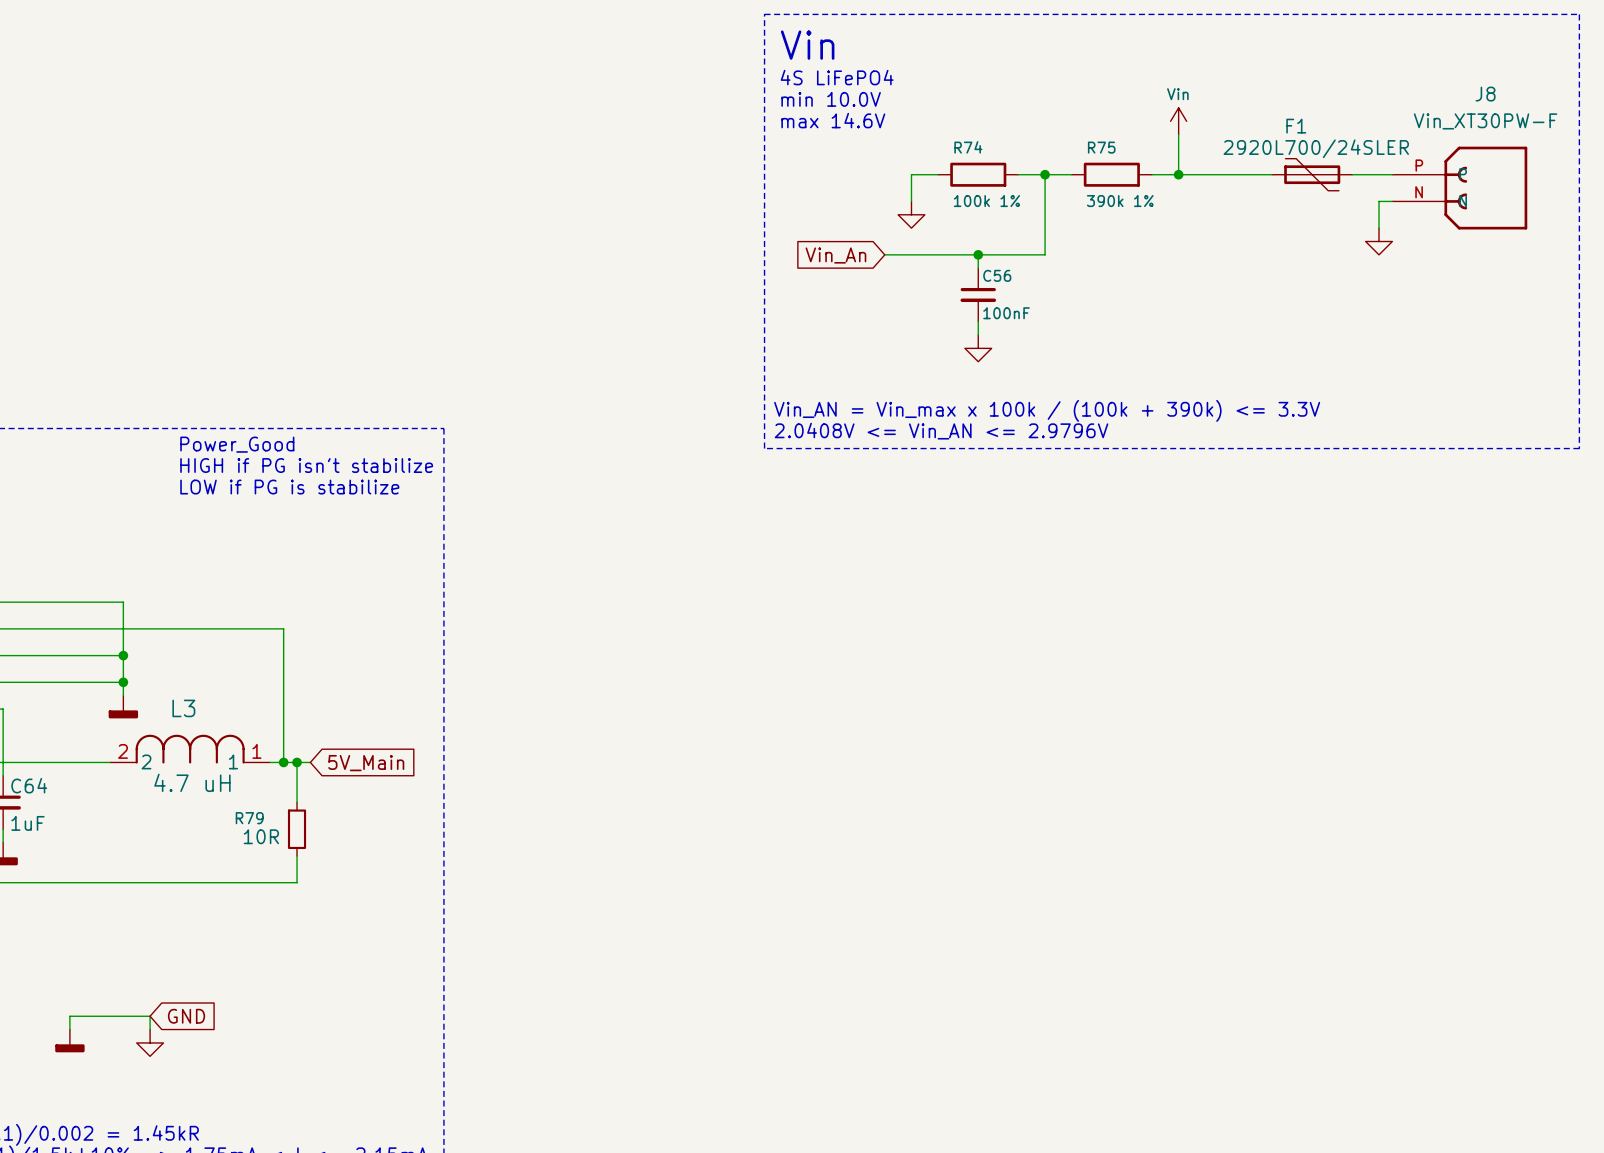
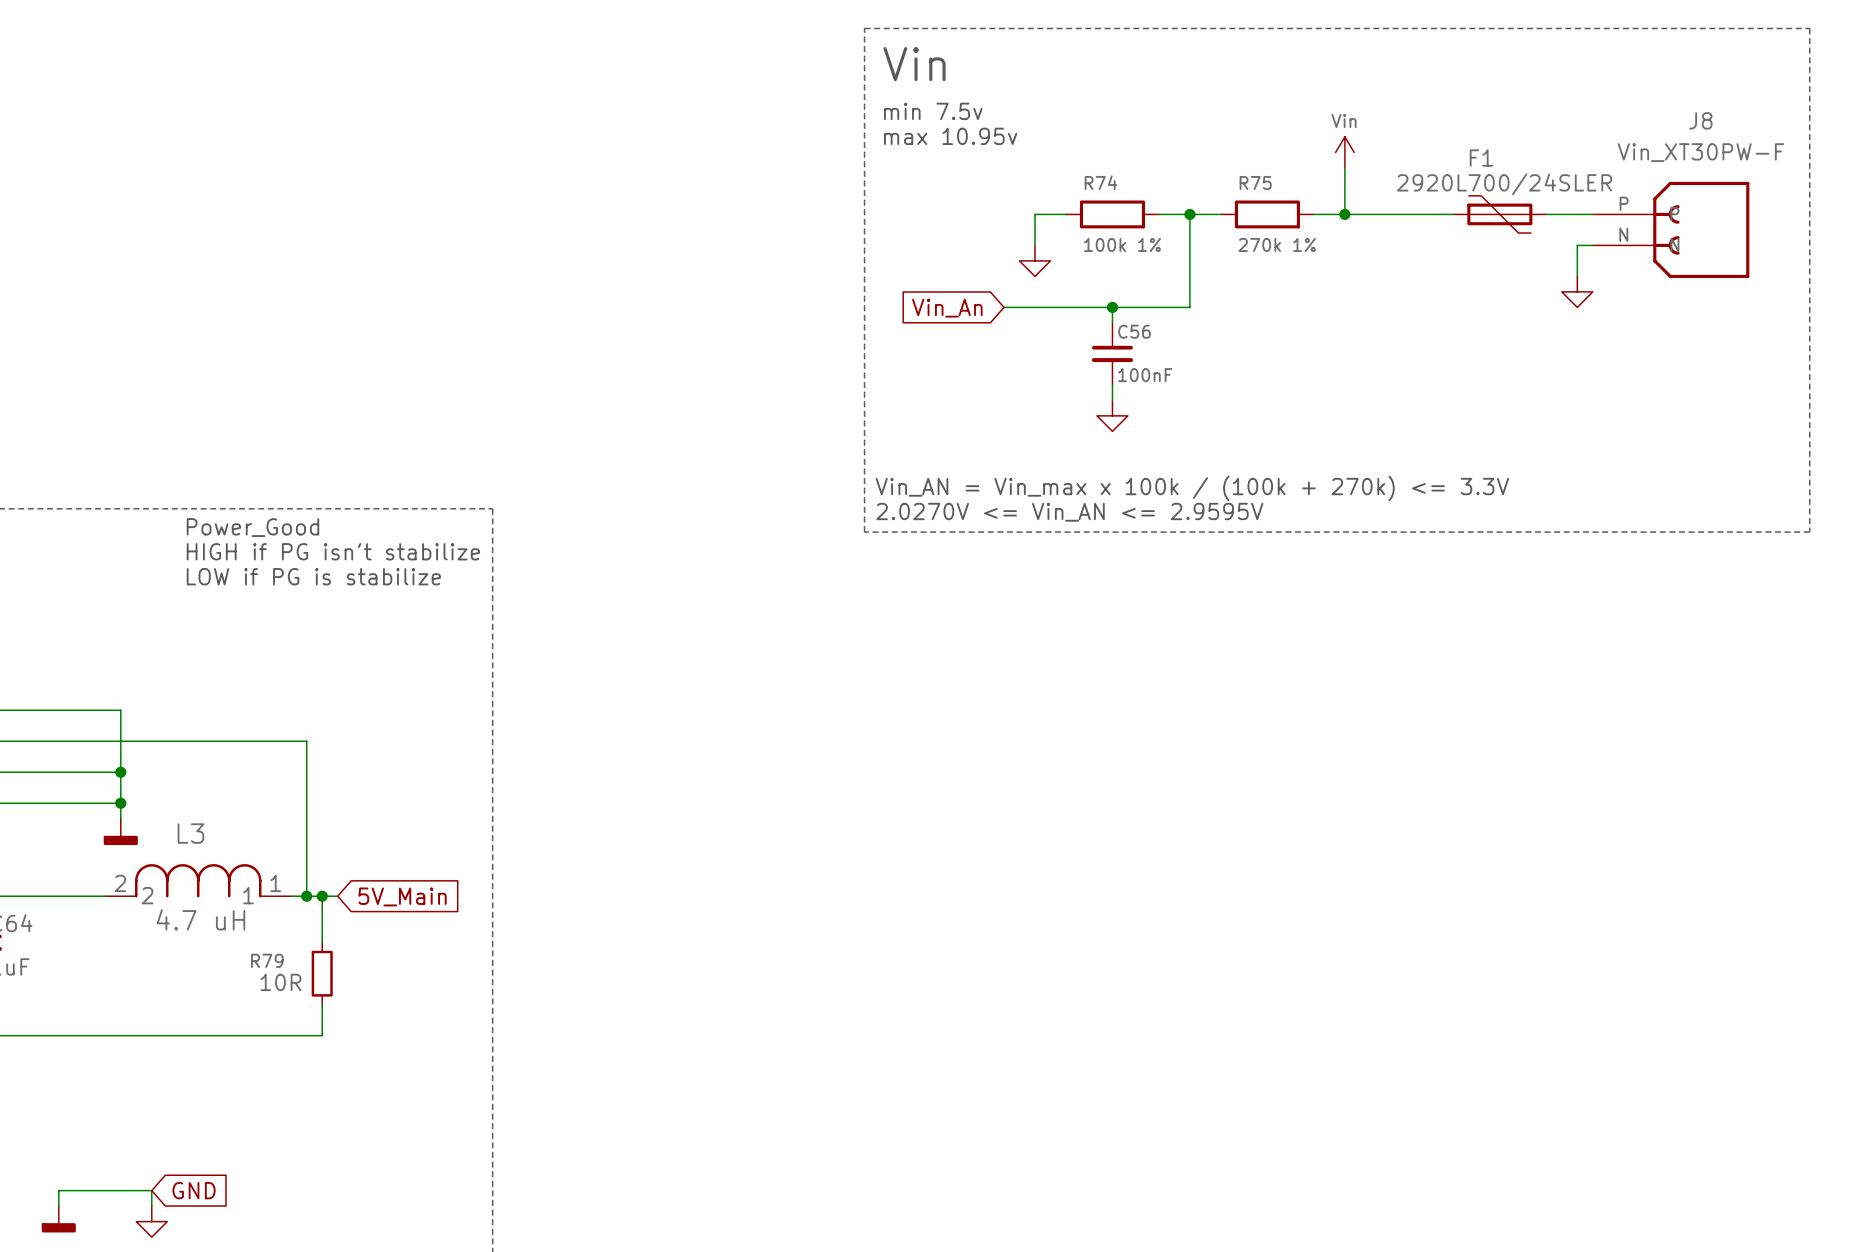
text: 4S LiFePO4 (837, 77) -> none
text: none -> min 7.5v (933, 111)
text: min 10.0V (831, 99) -> none
text: max 14.6V (833, 120) -> max 10.95v (950, 136)
R75 value: 390k 1% (1120, 201) -> 270k 1% (1277, 244)
text: Vin_AN = Vin_max x 100k / (100k + 390k) <= 3.3V (1047, 410) -> Vin_AN = Vin_max x 100k / (100k + 270k) <= 3.3V (1192, 488)
text: 2.0408V <= Vin_AN <= 2.9796V (941, 431) -> 2.0270V <= Vin_AN <= 2.9595V (1069, 512)

